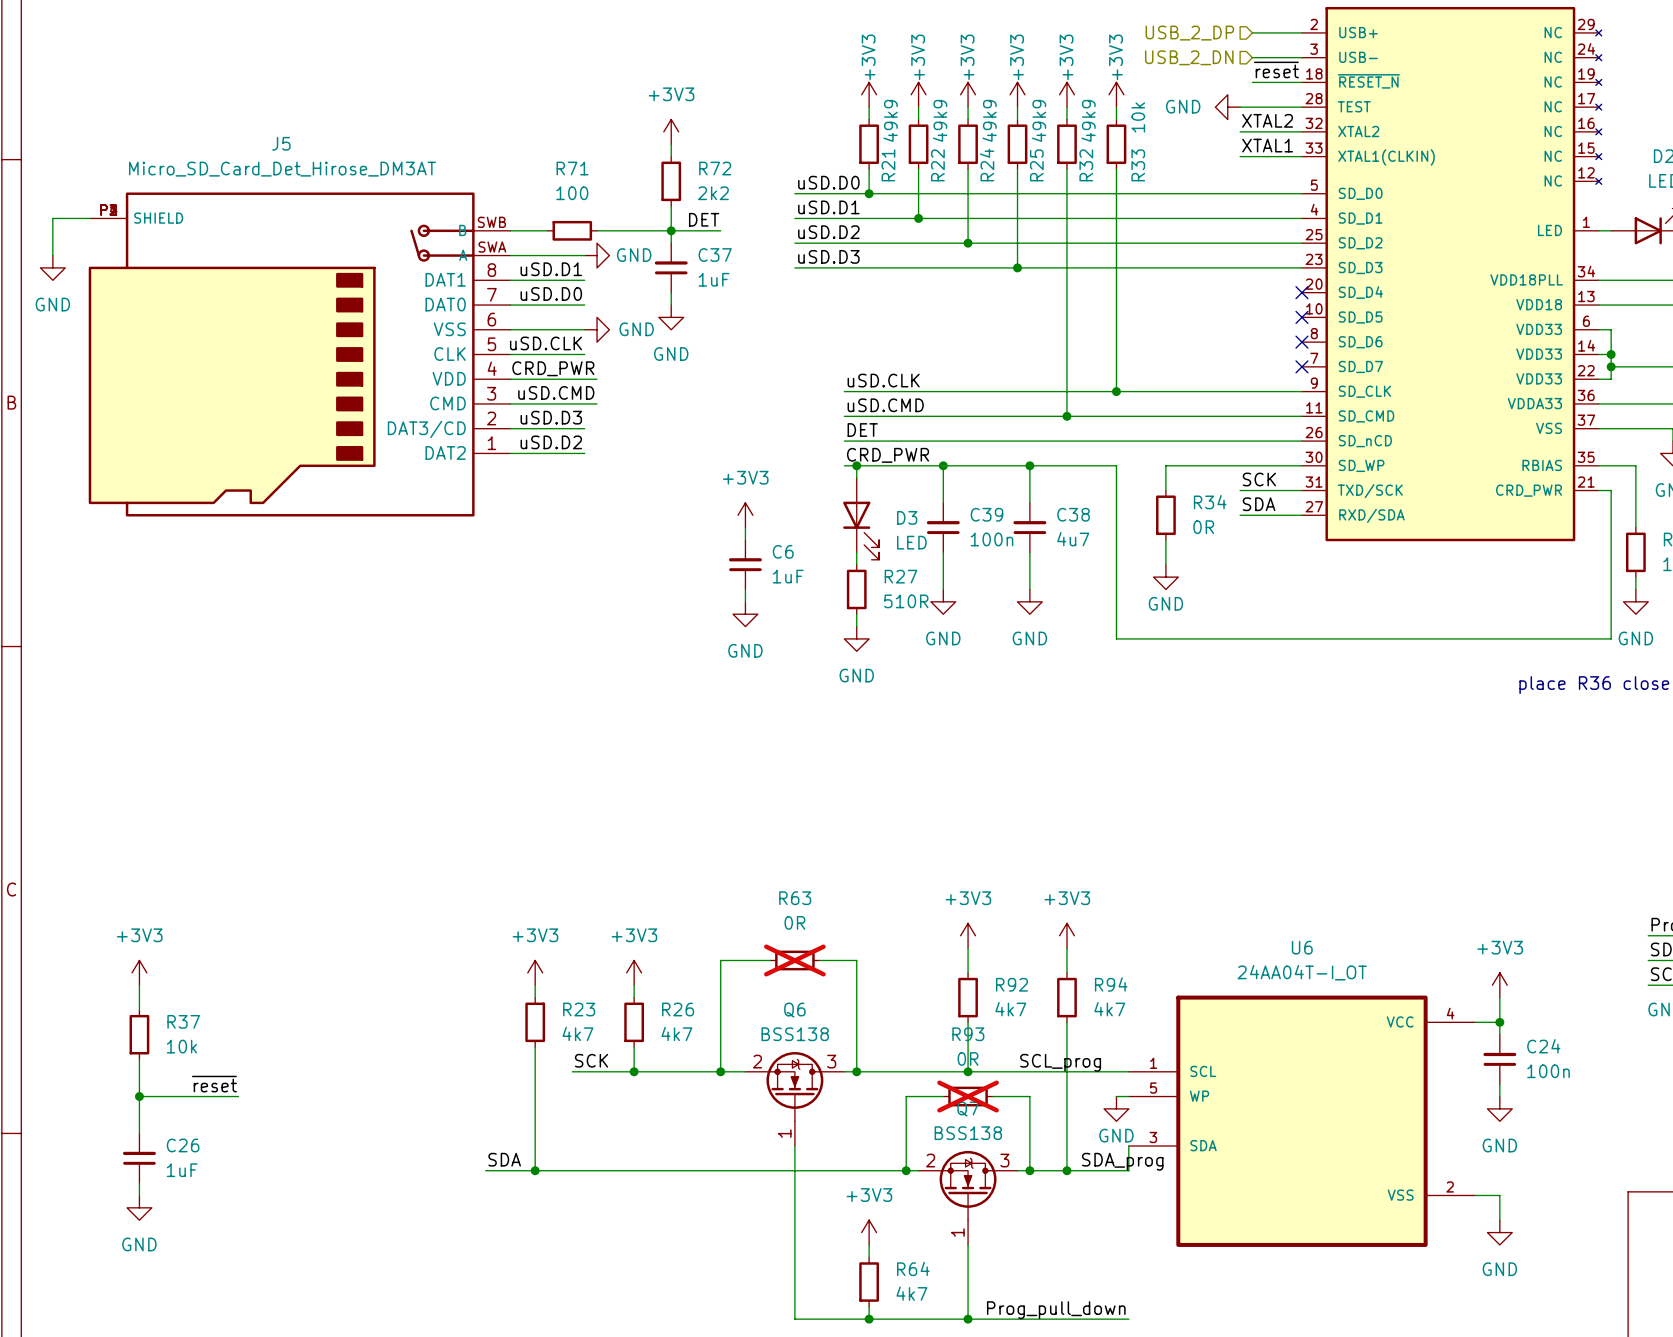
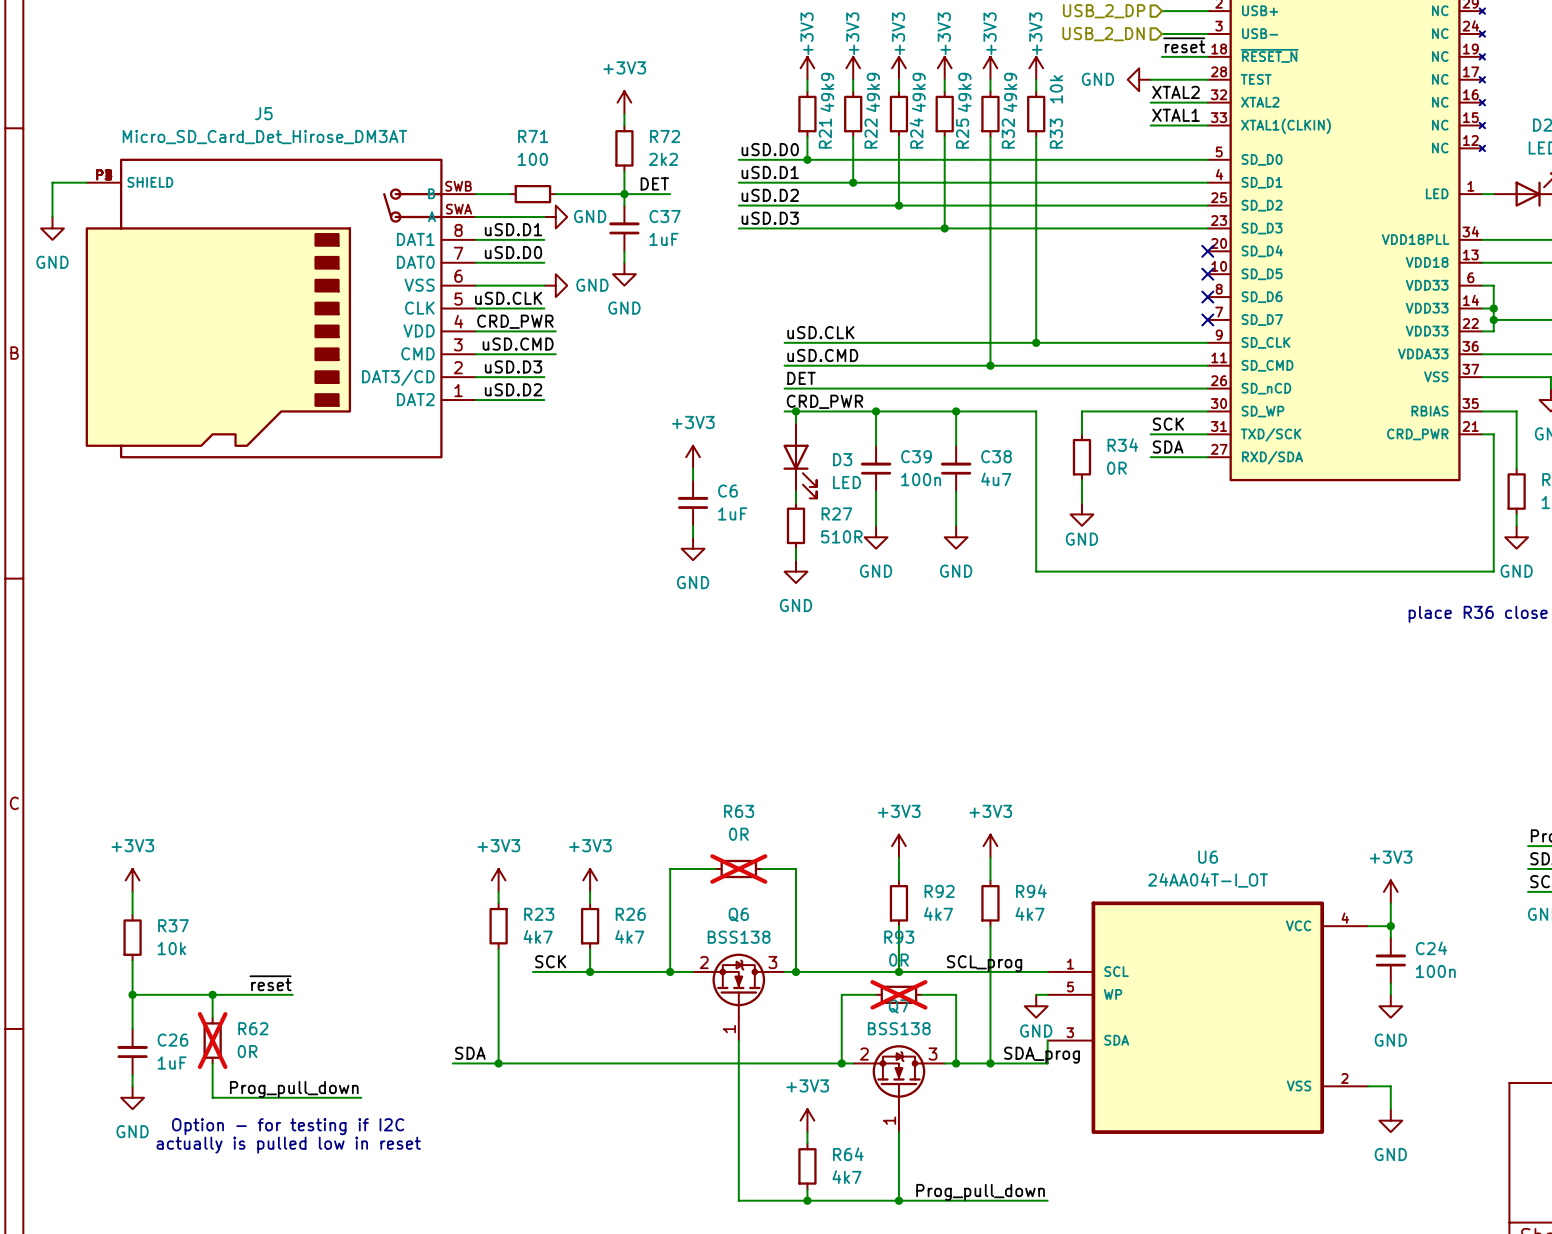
label position: ~{reset} (214, 1084) -> ~{reset} (270, 983)
wire: none -> (212, 994) (212, 1017)
junction: none -> (212, 994)
wire: none -> (224, 994) (292, 994)
R62: none -> (212, 1040)
wire: none -> (212, 1063) (212, 1097) (361, 1097)
label: none -> Prog_pull_down (294, 1089)
text: none -> Option - for testing if I2C (288, 1126)
text: none -> actually is pulled low in reset (288, 1145)

